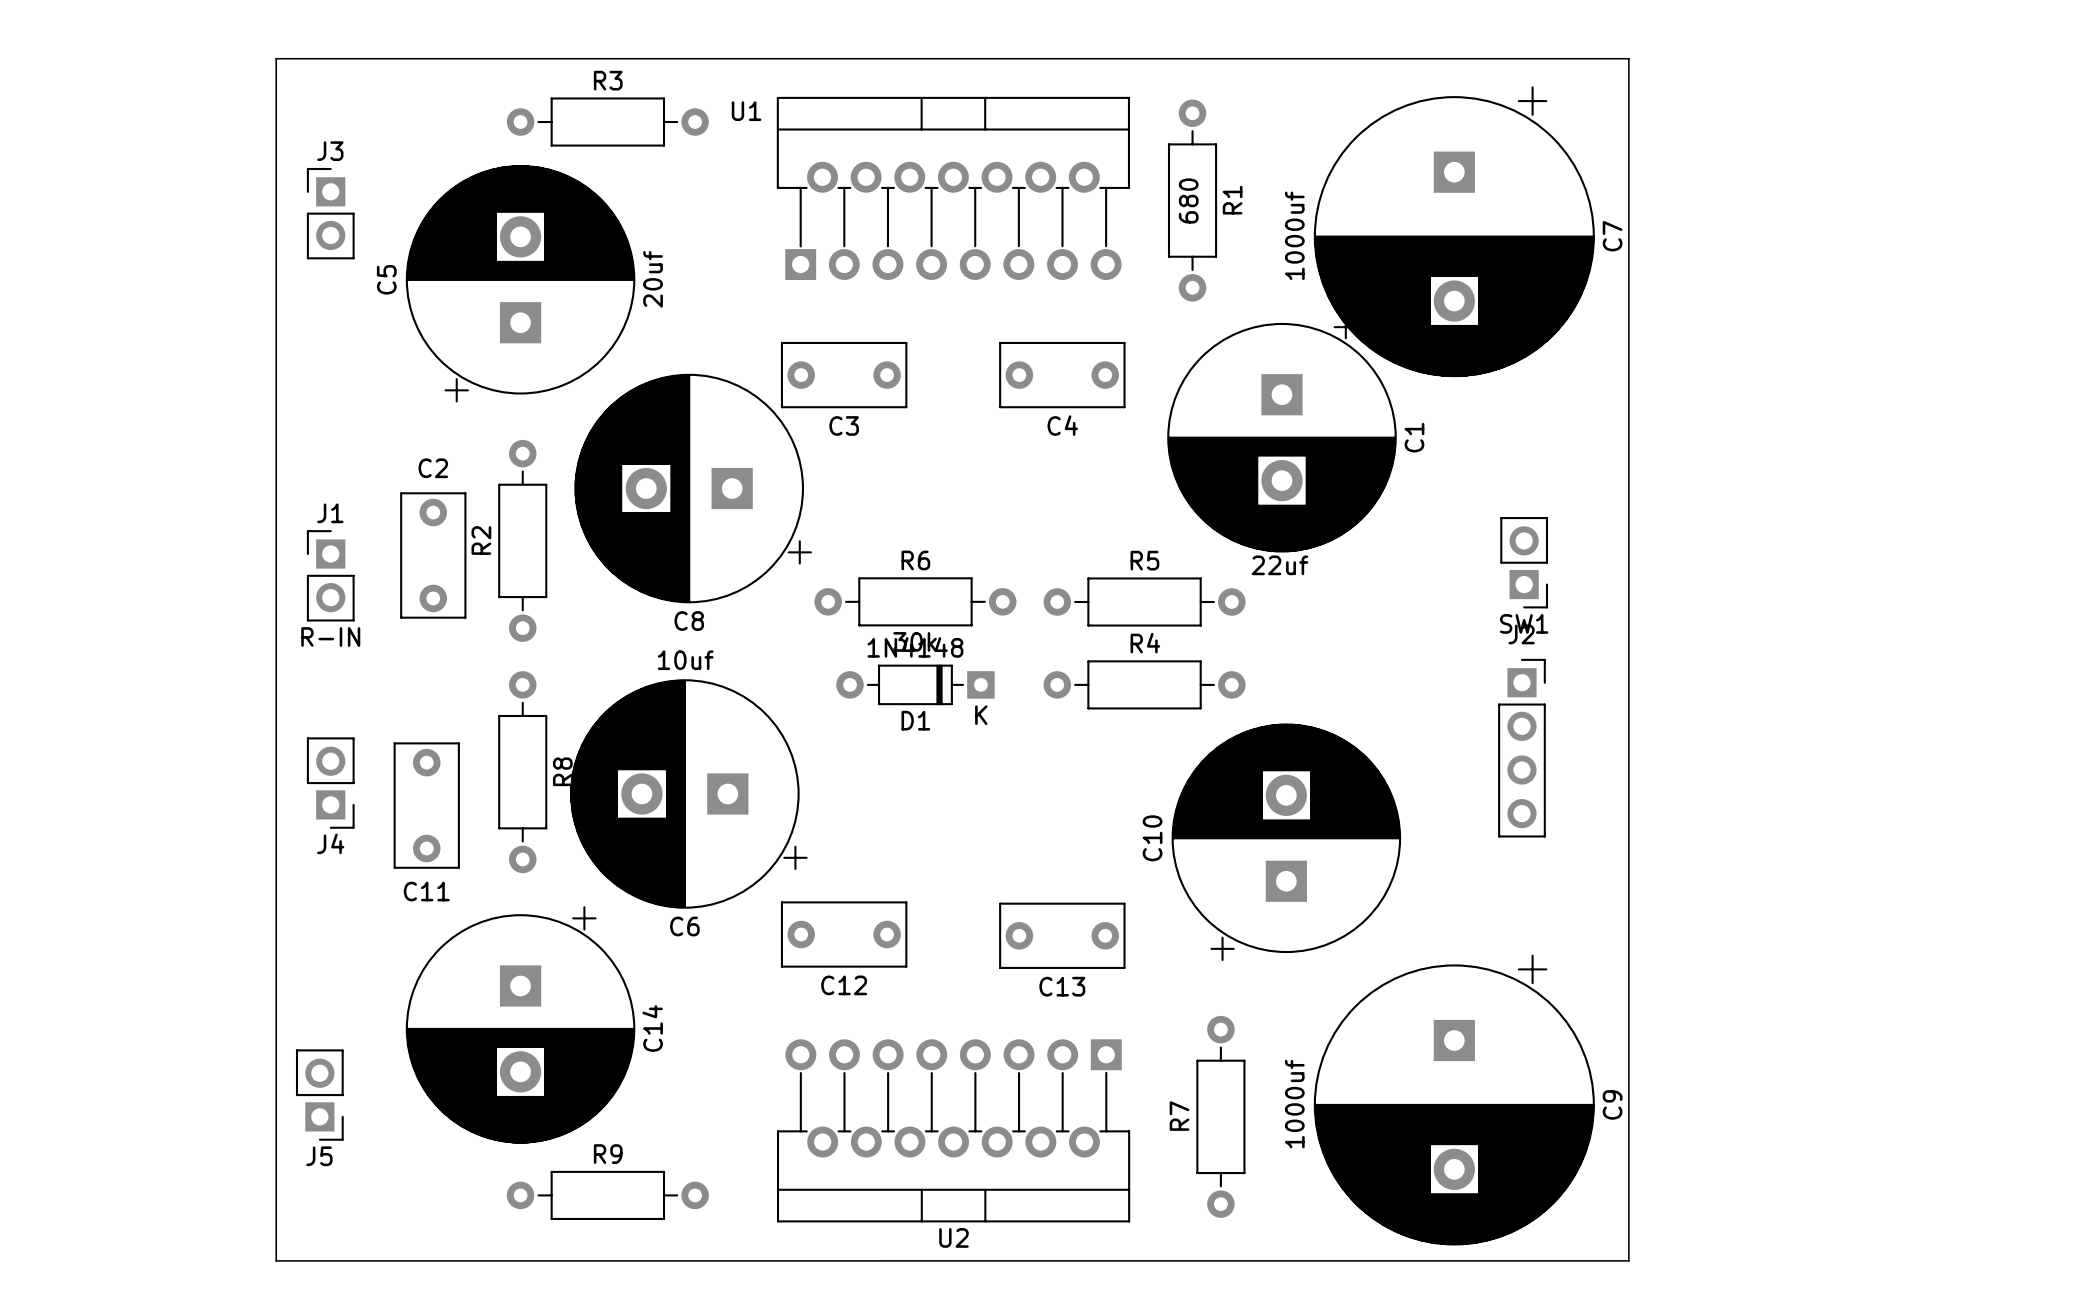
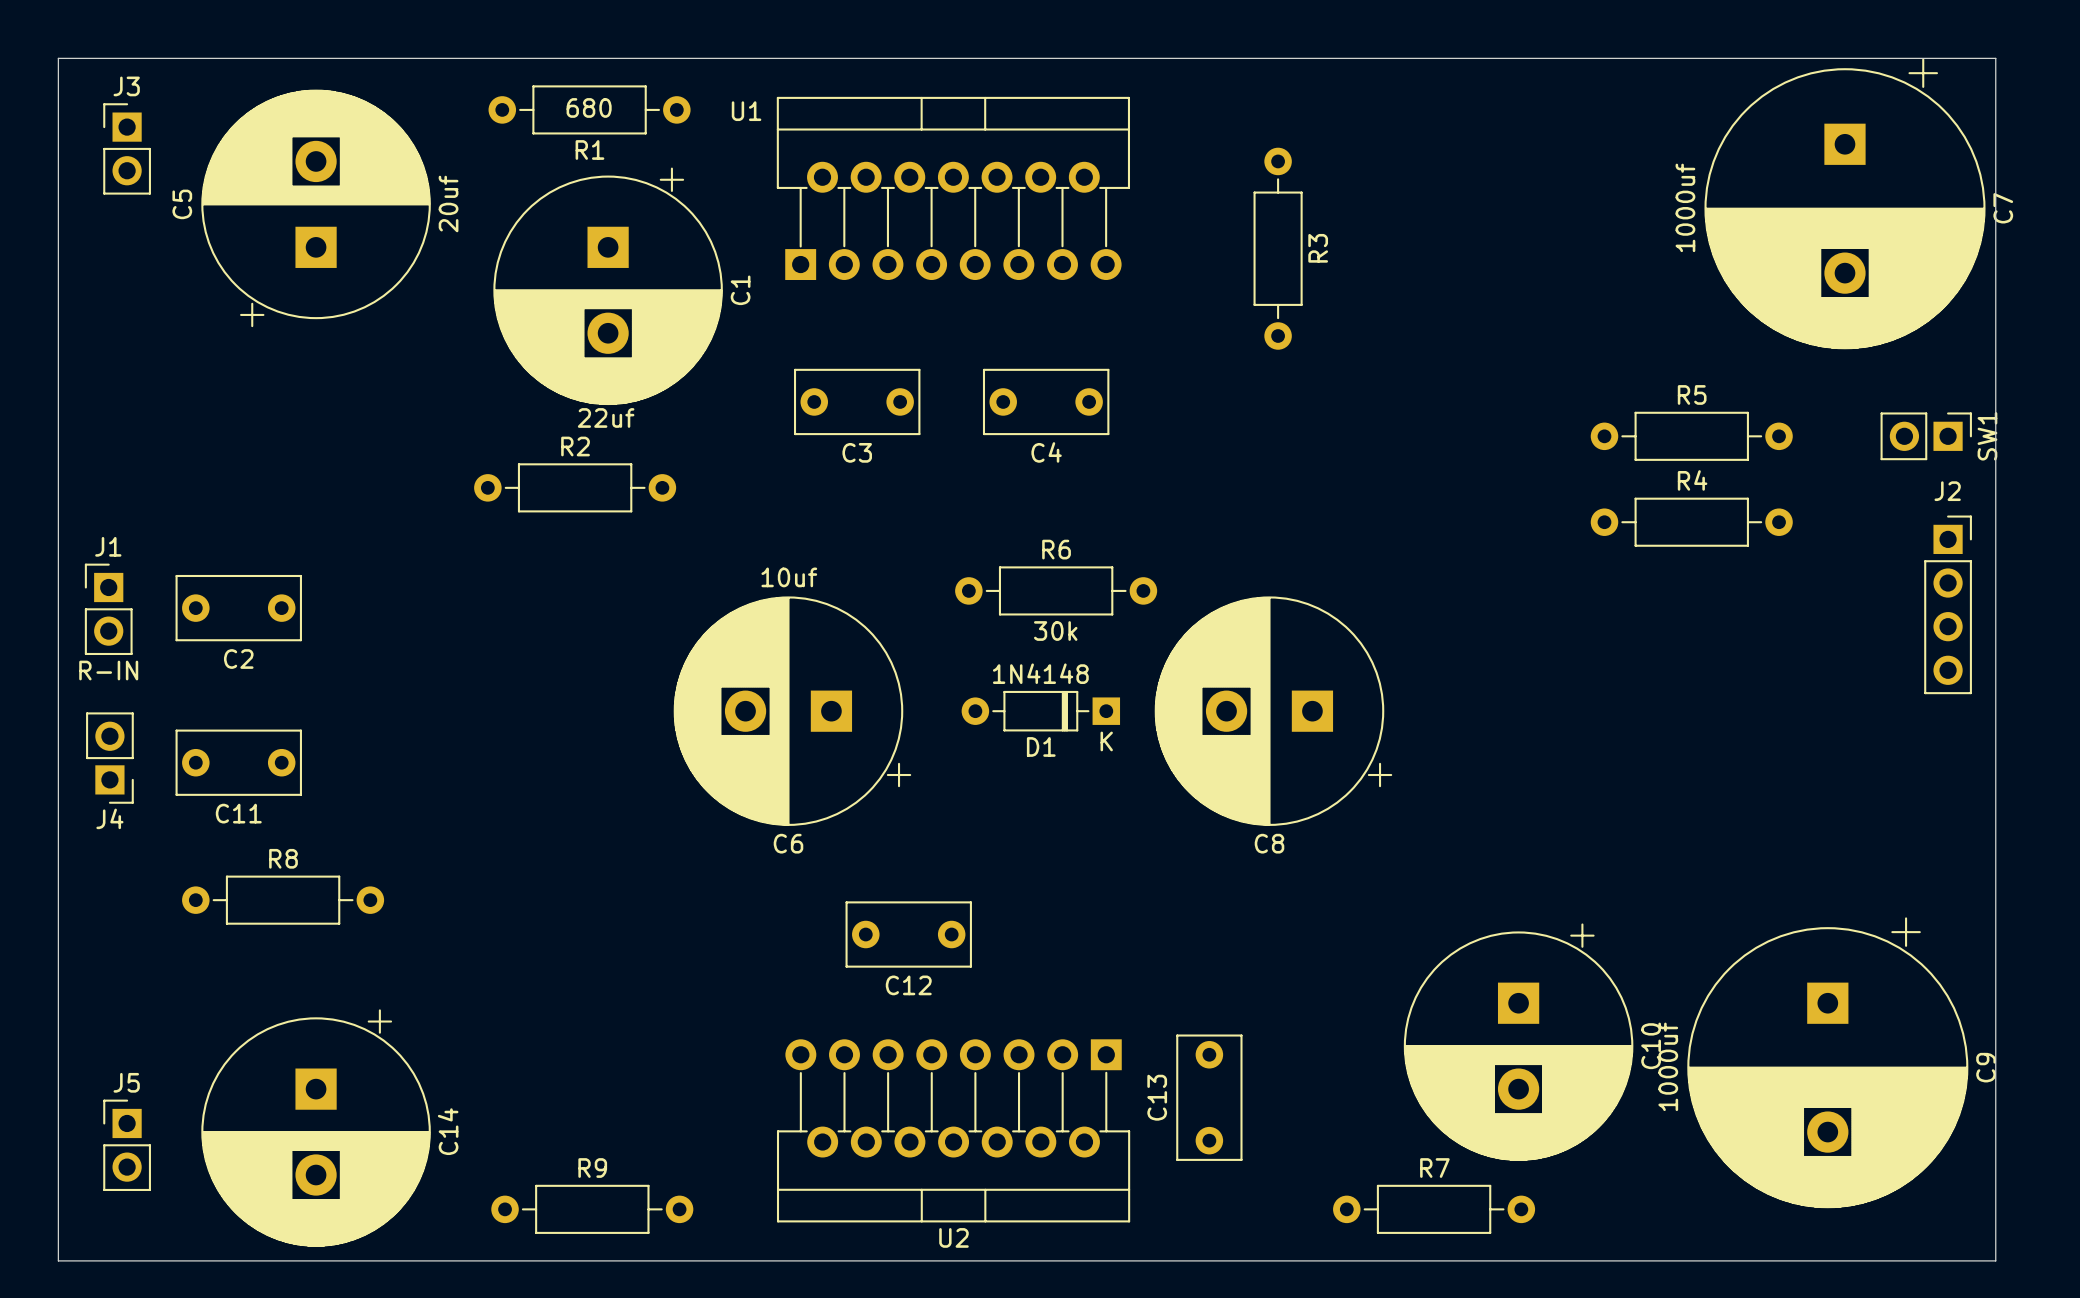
R3 rotation: 0° (607, 122) -> 90° clockwise (1278, 248)
R3 position: (607, 122) -> (1278, 248)
R1 rotation: 0° (1192, 200) -> 90° clockwise (589, 109)
R1 position: (1192, 200) -> (589, 109)
J3 position: (330, 213) -> (127, 148)
C7 position: (1454, 231) -> (1844, 203)
C5 position: (520, 283) -> (316, 208)
C3 position: (844, 375) -> (857, 401)
C4 position: (1062, 375) -> (1046, 401)
C1 position: (1281, 433) -> (608, 286)
C2 name position: C2 (433, 468) -> C2 (238, 659)
C8 position: (693, 488) -> (1273, 711)
R2 rotation: 0° (522, 540) -> 90° clockwise (575, 487)
C2 rotation: 0° (433, 555) -> 90° clockwise (238, 608)
C2 position: (433, 555) -> (238, 608)
SW1 rotation: 0° (1524, 562) -> 90° counterclockwise (1926, 436)
SW1 position: (1524, 562) -> (1926, 436)
J1 position: (330, 575) -> (108, 609)
R6 position: (915, 601) -> (1056, 590)
R5 position: (1144, 601) -> (1691, 436)
D1 position: (915, 684) -> (1040, 711)
R4 position: (1144, 684) -> (1691, 522)
J2 position: (1521, 748) -> (1948, 604)
R8 name position: R8 (562, 771) -> R8 (283, 858)
R8 rotation: 0° (522, 772) -> 90° clockwise (283, 900)
R8 position: (522, 772) -> (283, 900)
J4 position: (330, 783) -> (109, 758)
C6 position: (688, 793) -> (792, 711)
C11 rotation: 0° (426, 805) -> 90° clockwise (238, 762)
C11 position: (426, 805) -> (238, 762)
C10 rotation: 0° (1286, 842) -> 180° (1518, 1042)
C10 position: (1286, 842) -> (1518, 1042)
C11 name position: C11 (426, 891) -> C11 (238, 813)
C12 position: (844, 934) -> (908, 934)
C13 rotation: 0° (1062, 935) -> 90° clockwise (1209, 1097)
C13 position: (1062, 935) -> (1209, 1097)
C14 position: (520, 1024) -> (316, 1128)
J5 rotation: 0° (319, 1095) -> 180° (127, 1145)
J5 position: (319, 1095) -> (127, 1145)
C9 position: (1454, 1100) -> (1827, 1062)
R7 rotation: 0° (1220, 1116) -> 90° clockwise (1434, 1209)
R7 position: (1220, 1116) -> (1434, 1209)
R9 position: (607, 1195) -> (592, 1209)
board edge: (276, 1260) (276, 58) (1628, 58) (1628, 1260) -> (276, 1260) (58, 1260) (58, 58) (1995, 58) (1995, 1260) (1628, 1260)

